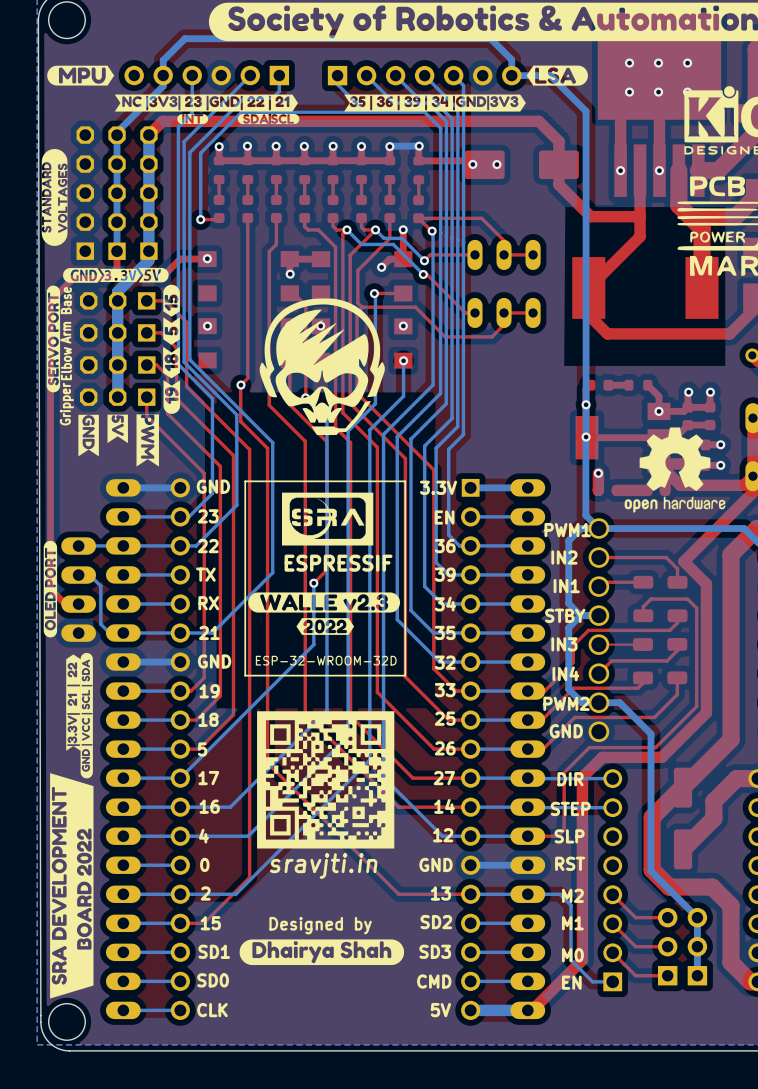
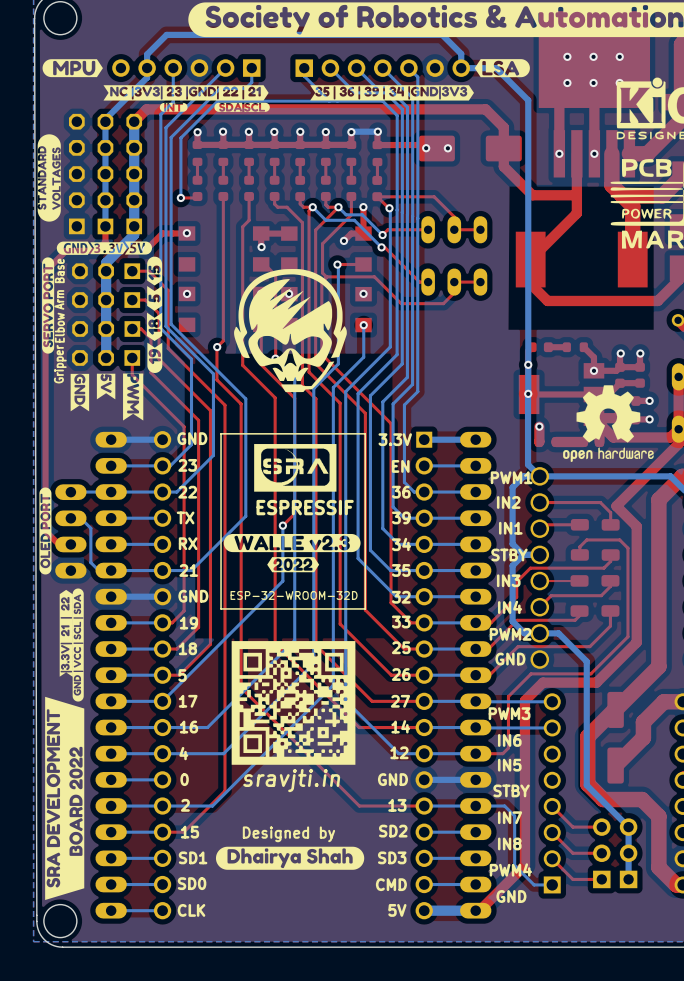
text: DIR (570, 779) -> none
text: none -> PWM3 (509, 713)
text: STEP (570, 808) -> none
text: none -> IN6 (509, 740)
text: SLP (569, 836) -> none
text: none -> IN5 (509, 765)
text: RST (570, 863) -> none
text: none -> STBY (511, 790)
text: M2 (572, 895) -> none
text: none -> IN7 (510, 817)
text: M1 (572, 923) -> none
text: none -> IN8 (509, 843)
text: M0 (572, 955) -> none
text: none -> PWM4 (510, 869)
text: EN (571, 982) -> none
text: none -> GND (511, 896)

